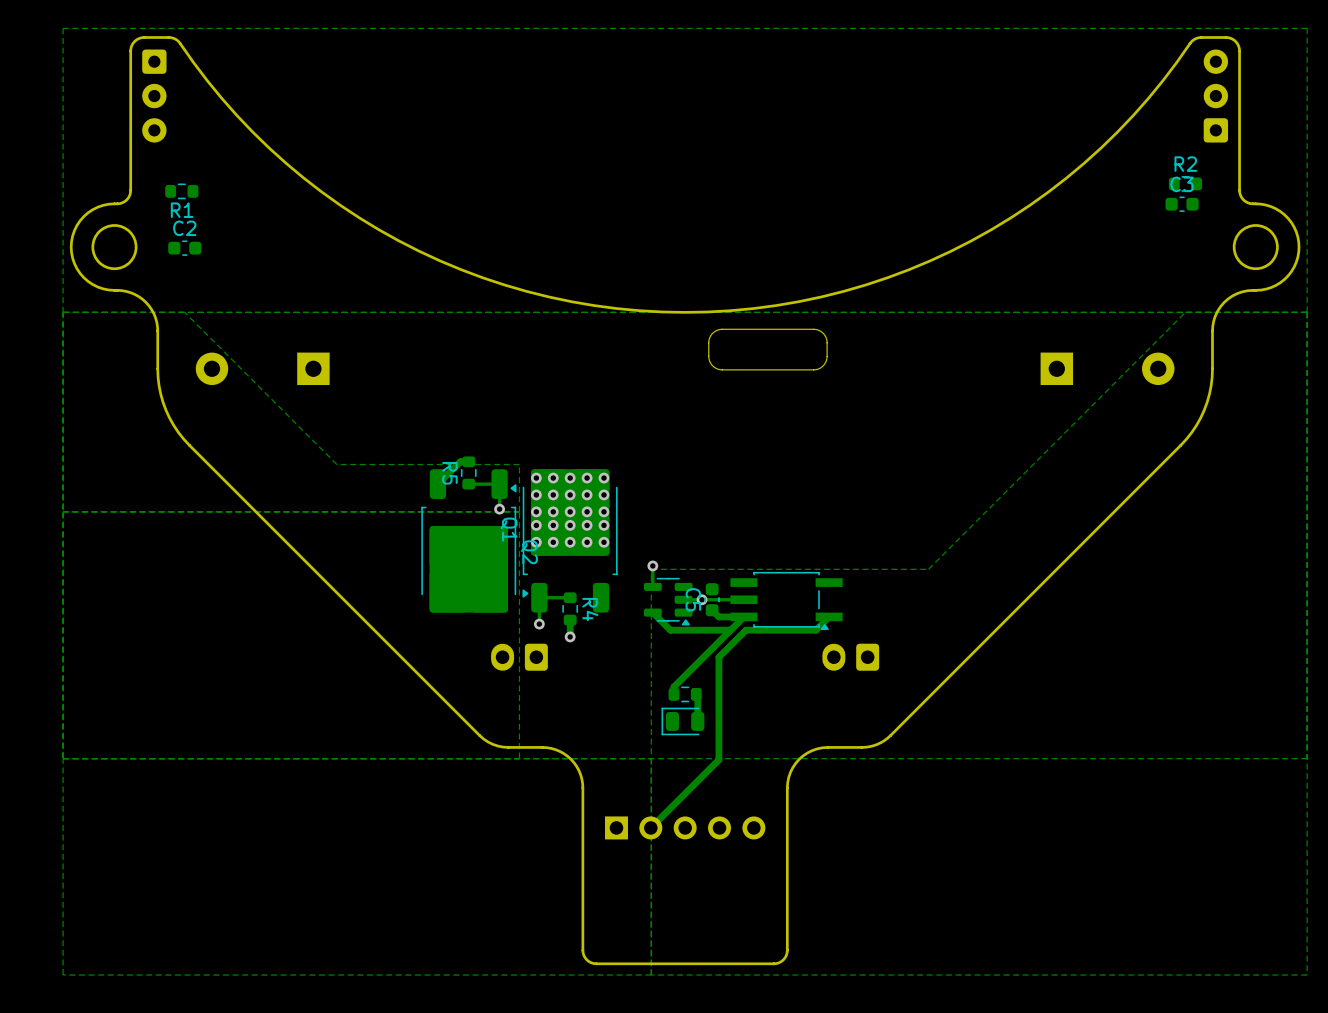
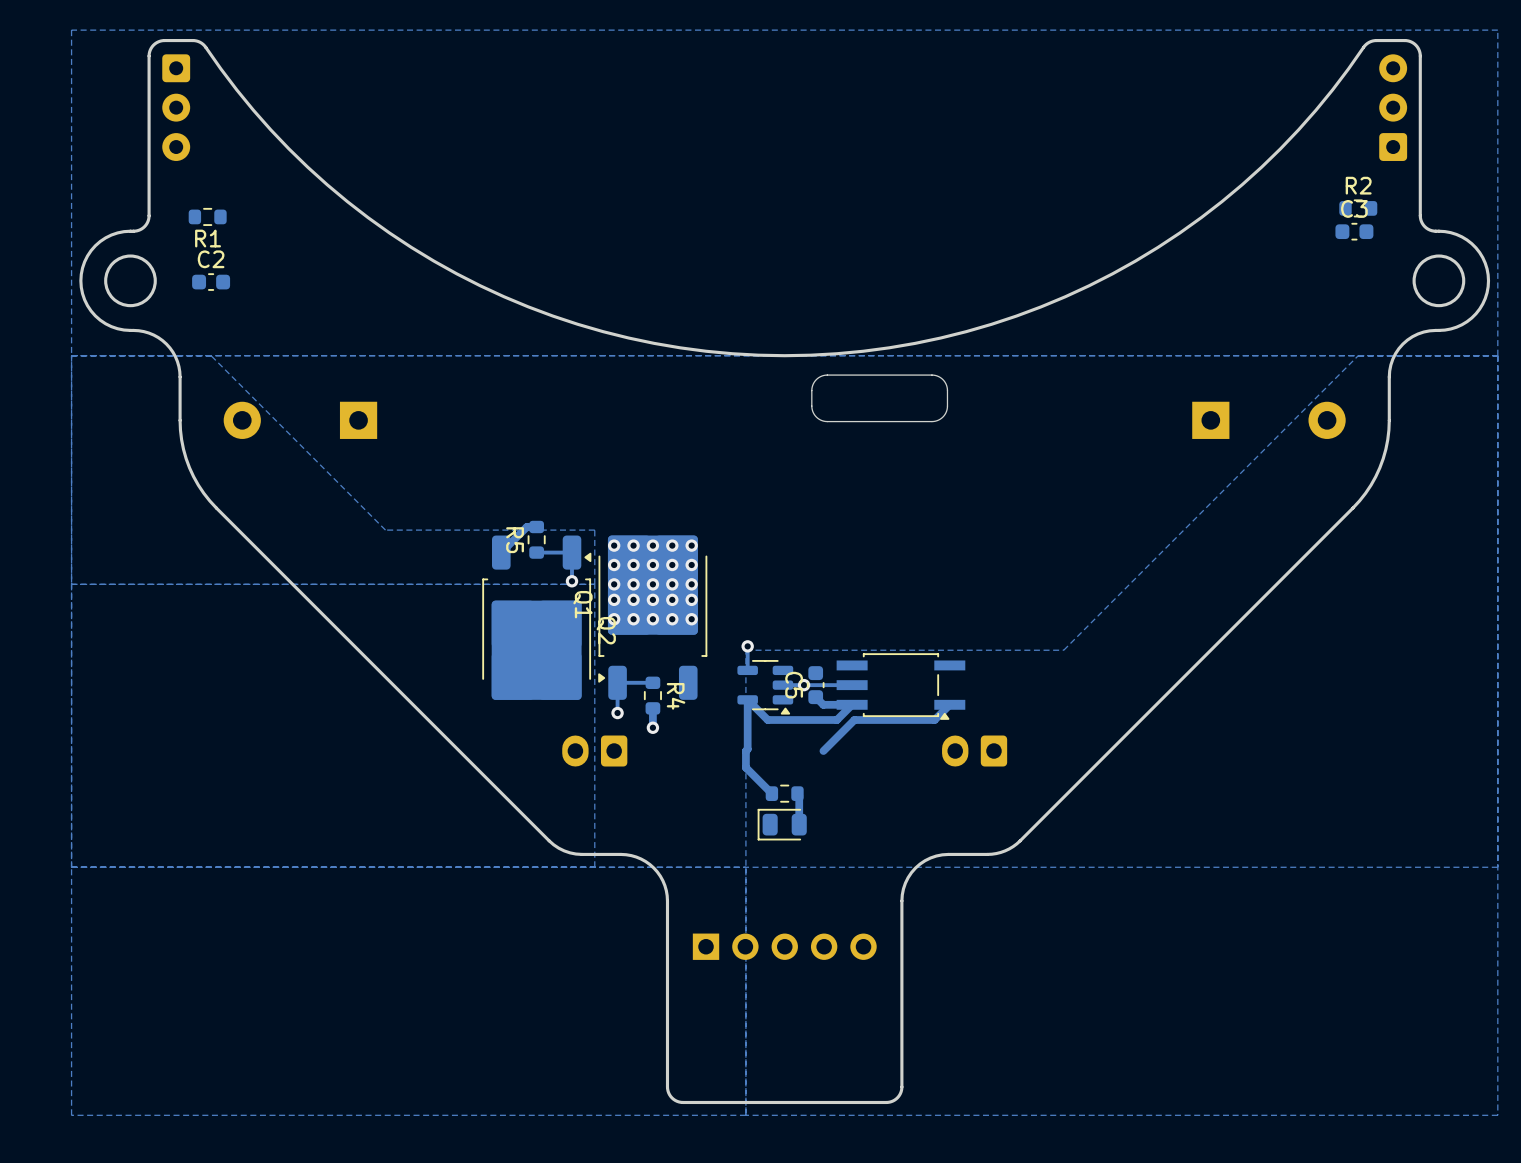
track: (730, 630) (673, 686) (673, 694) -> (747, 699) (745, 767) (771, 793)
track: (718, 657) (718, 759) (650, 827) -> none

